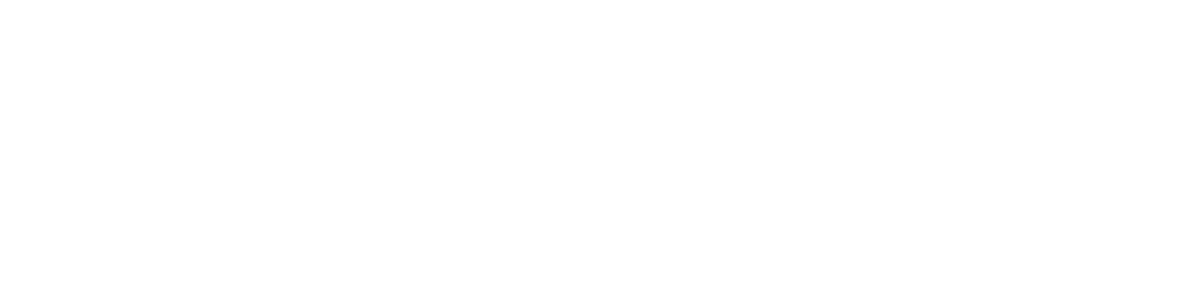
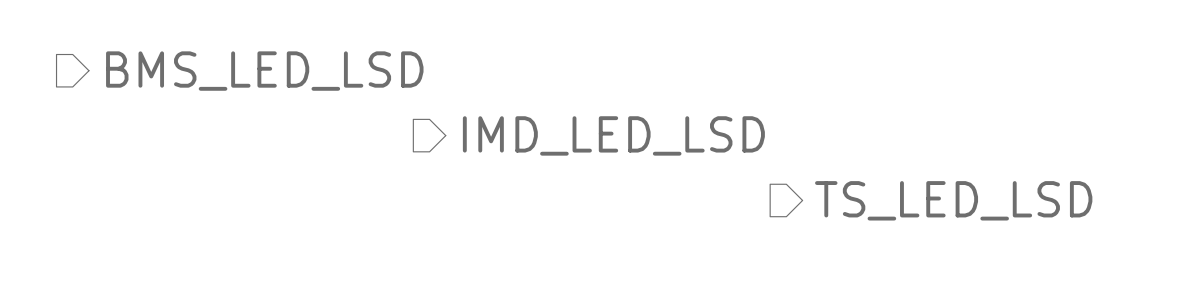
hierarchical label: none -> BMS_LED_LSD (264, 71)
hierarchical label: none -> IMD_LED_LSD (613, 135)
hierarchical label: none -> TS_LED_LSD (953, 200)

